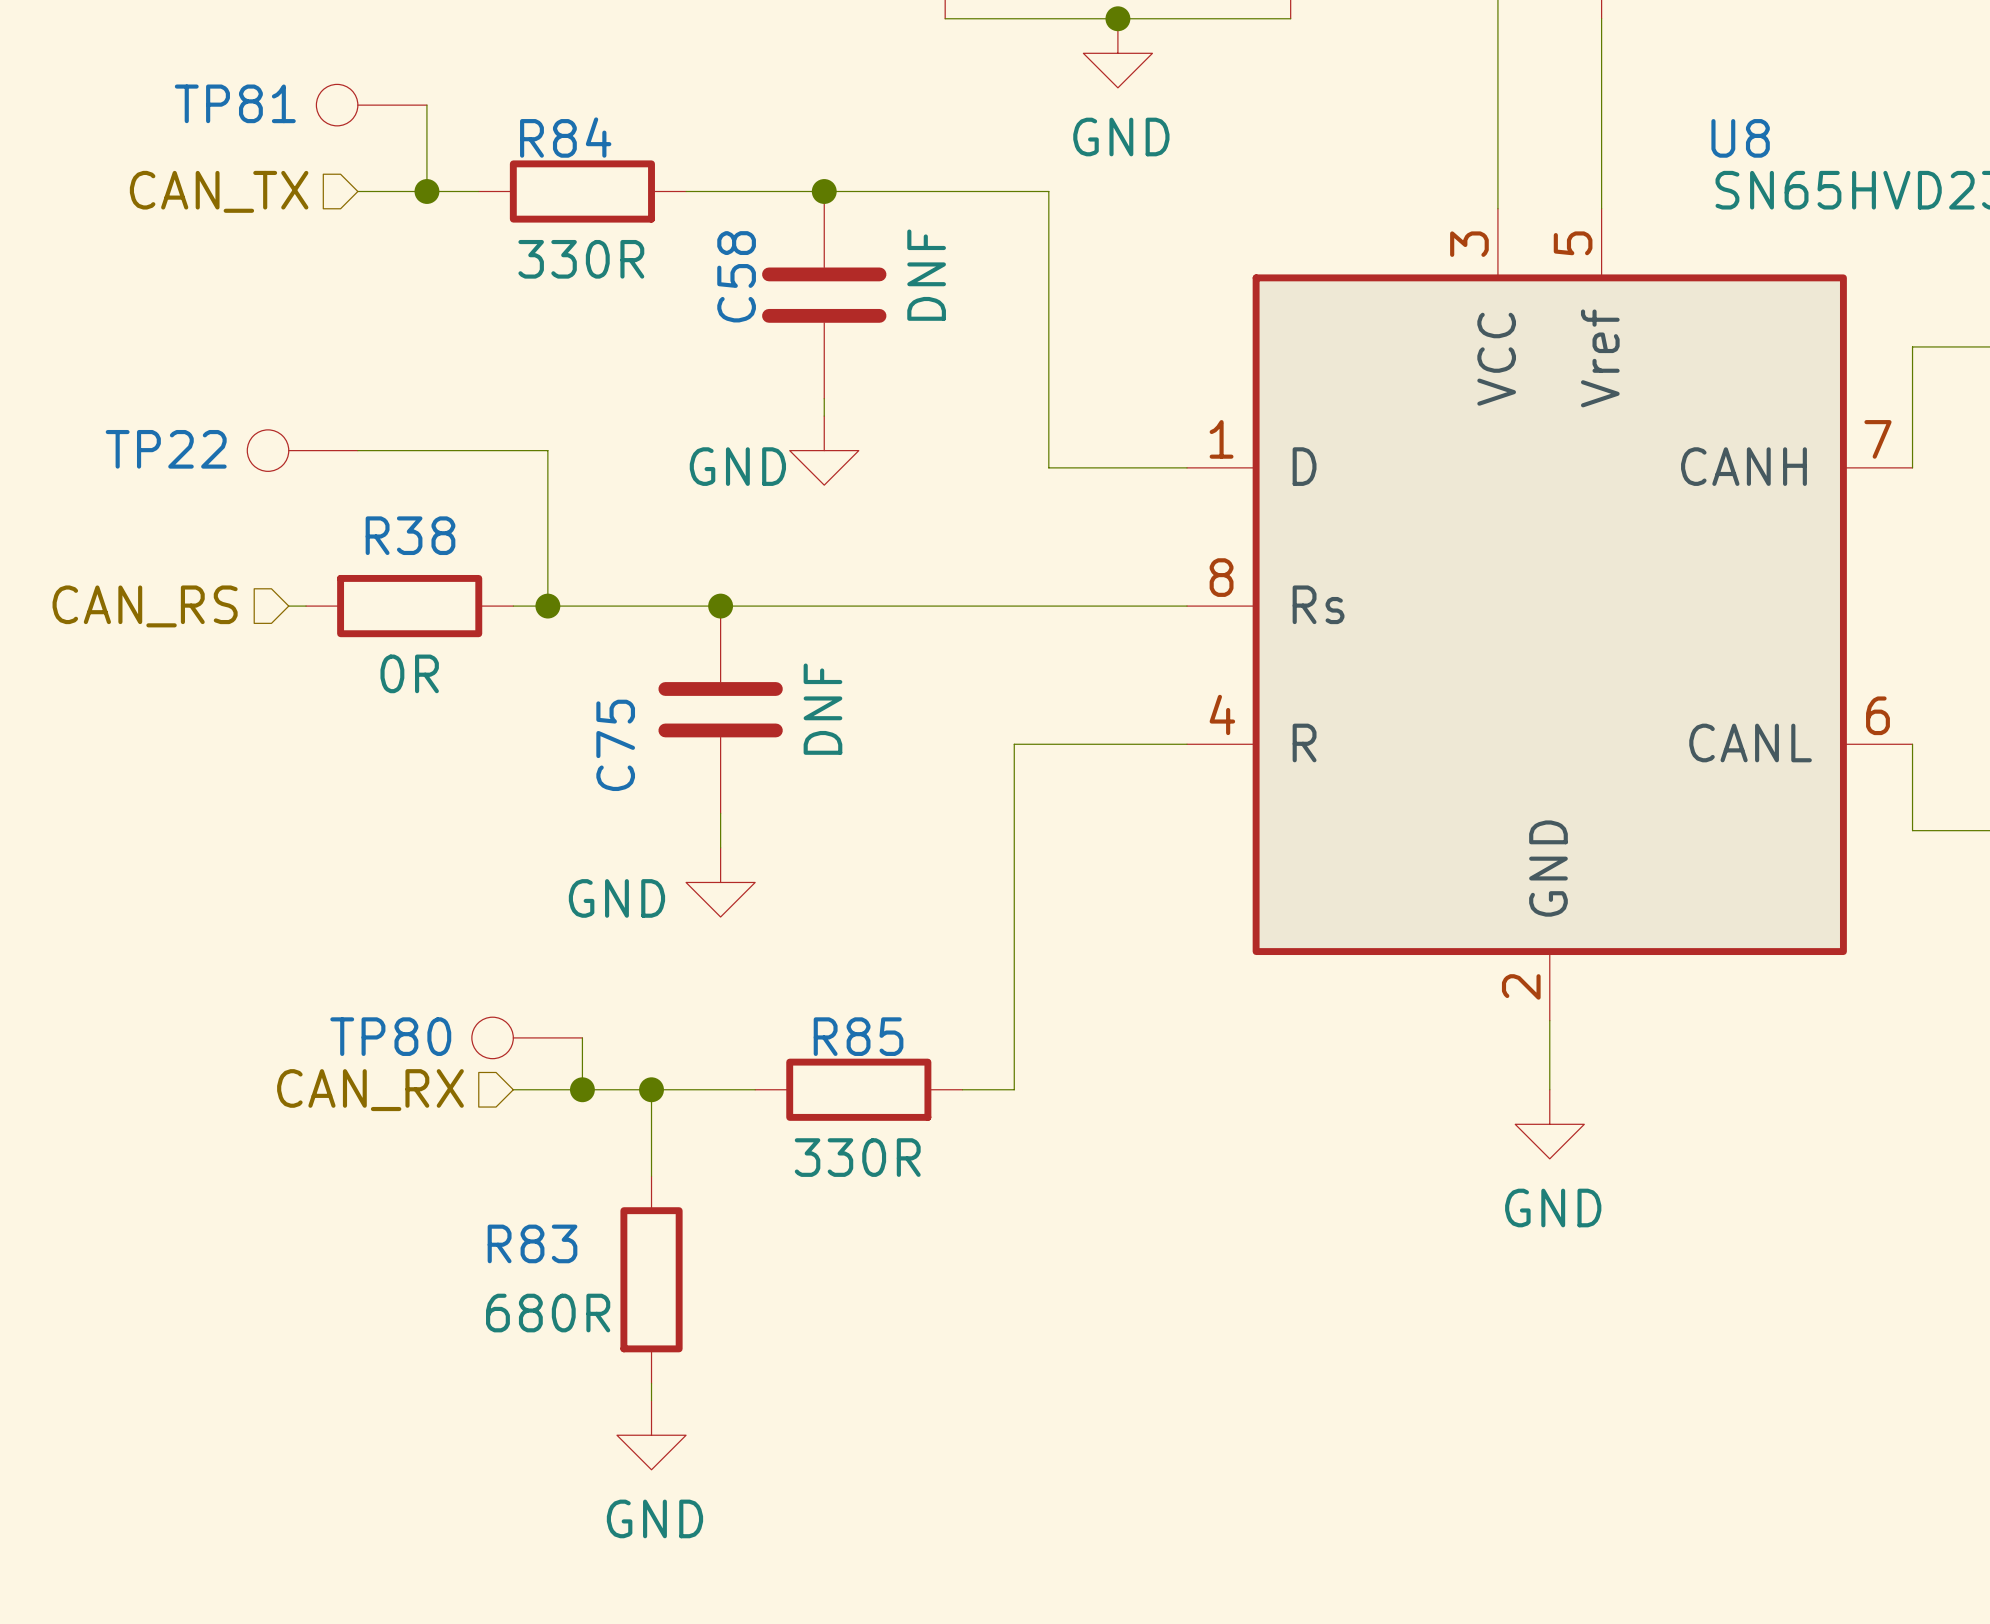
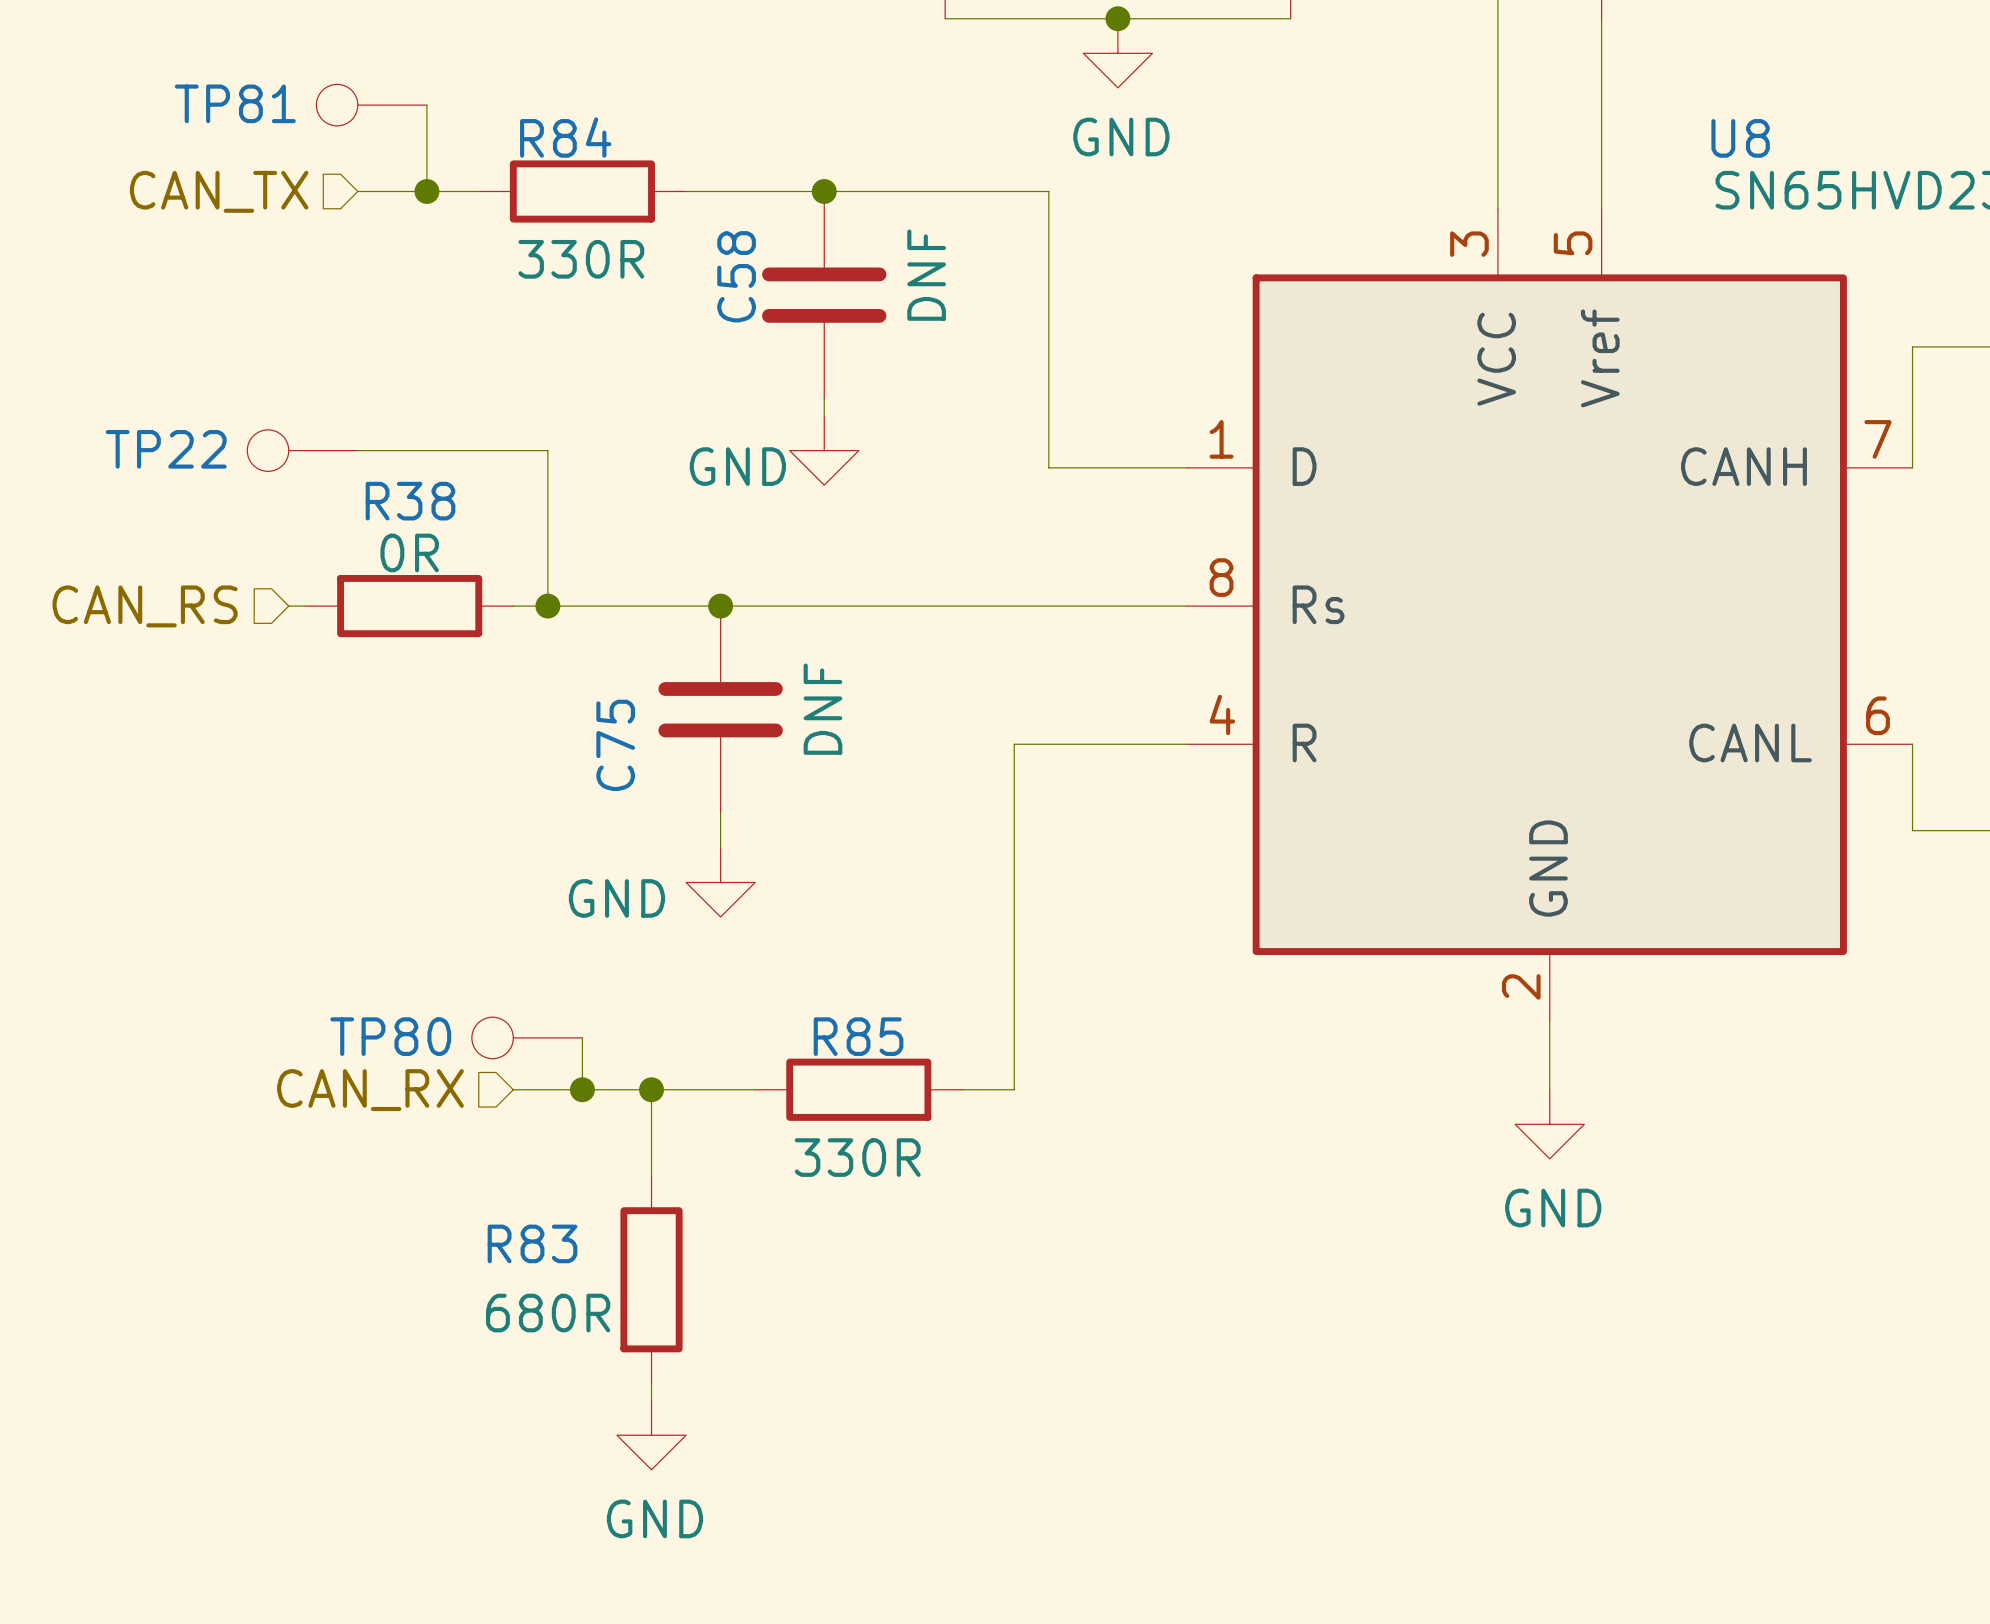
R38 name position: R38 (410, 535) -> R38 (410, 501)
R38 value position: 0R (409, 673) -> 0R (409, 552)

